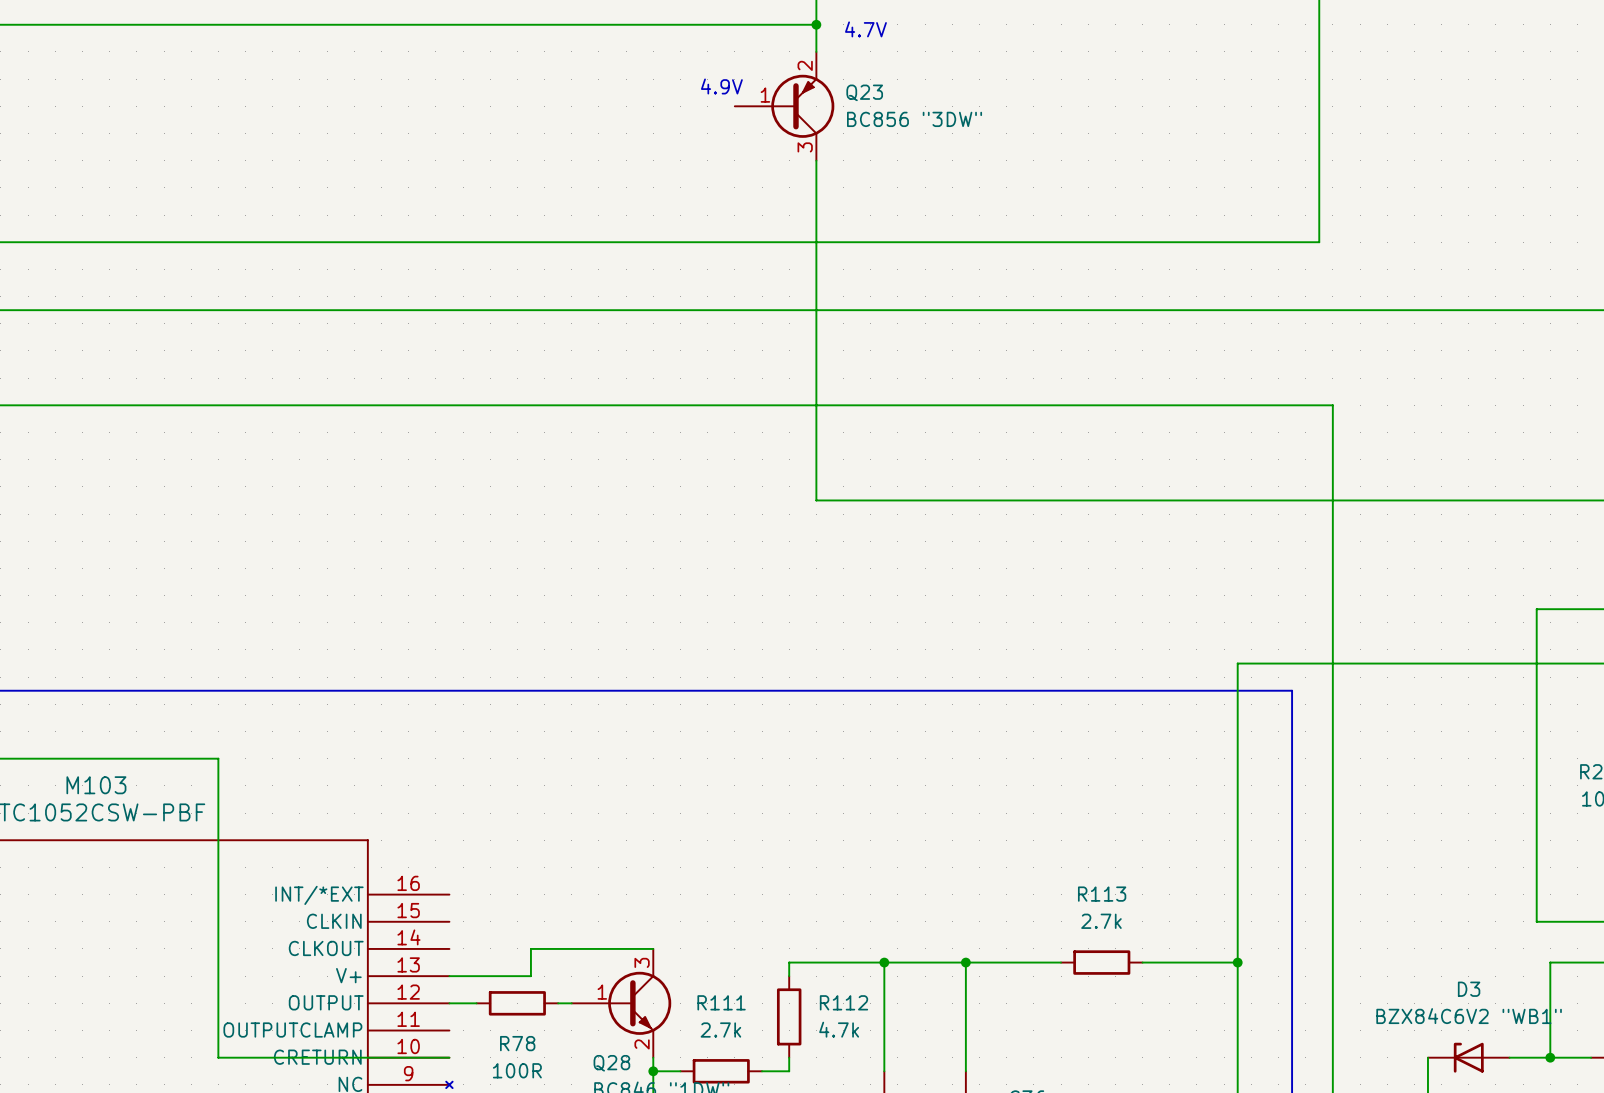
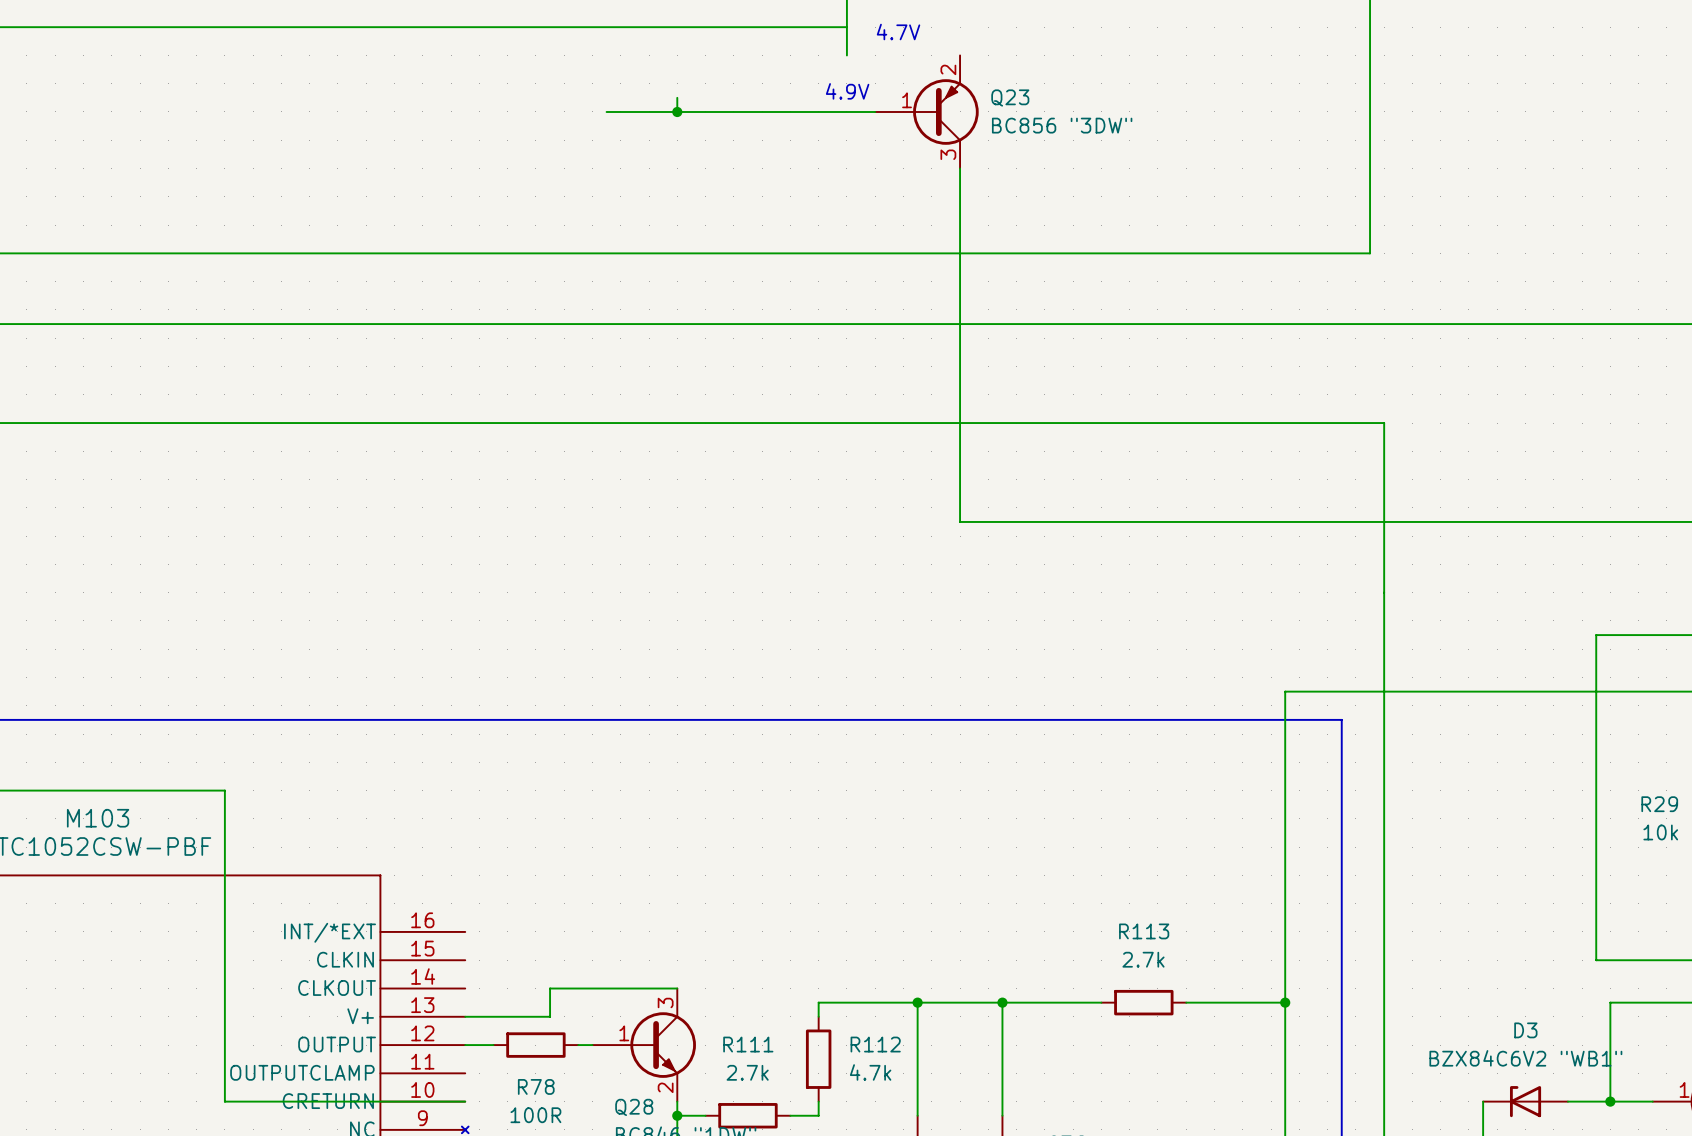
junction: (816, 24) -> none
text position: 4.9V (721, 86) -> 4.9V (847, 91)
wire: none -> (677, 97) (677, 111)
wire: none -> (606, 111) (875, 111)
junction: none -> (677, 111)
Q23 position: (784, 106) -> (926, 111)
wire: (816, 160) (816, 500) (925, 500) -> (960, 168) (960, 521)

